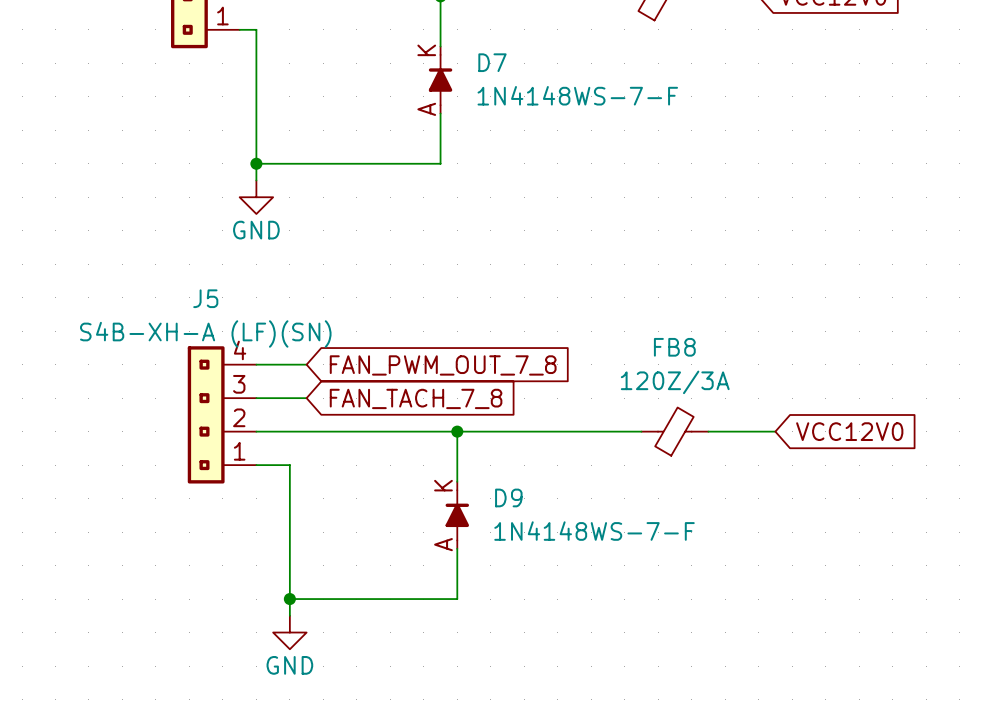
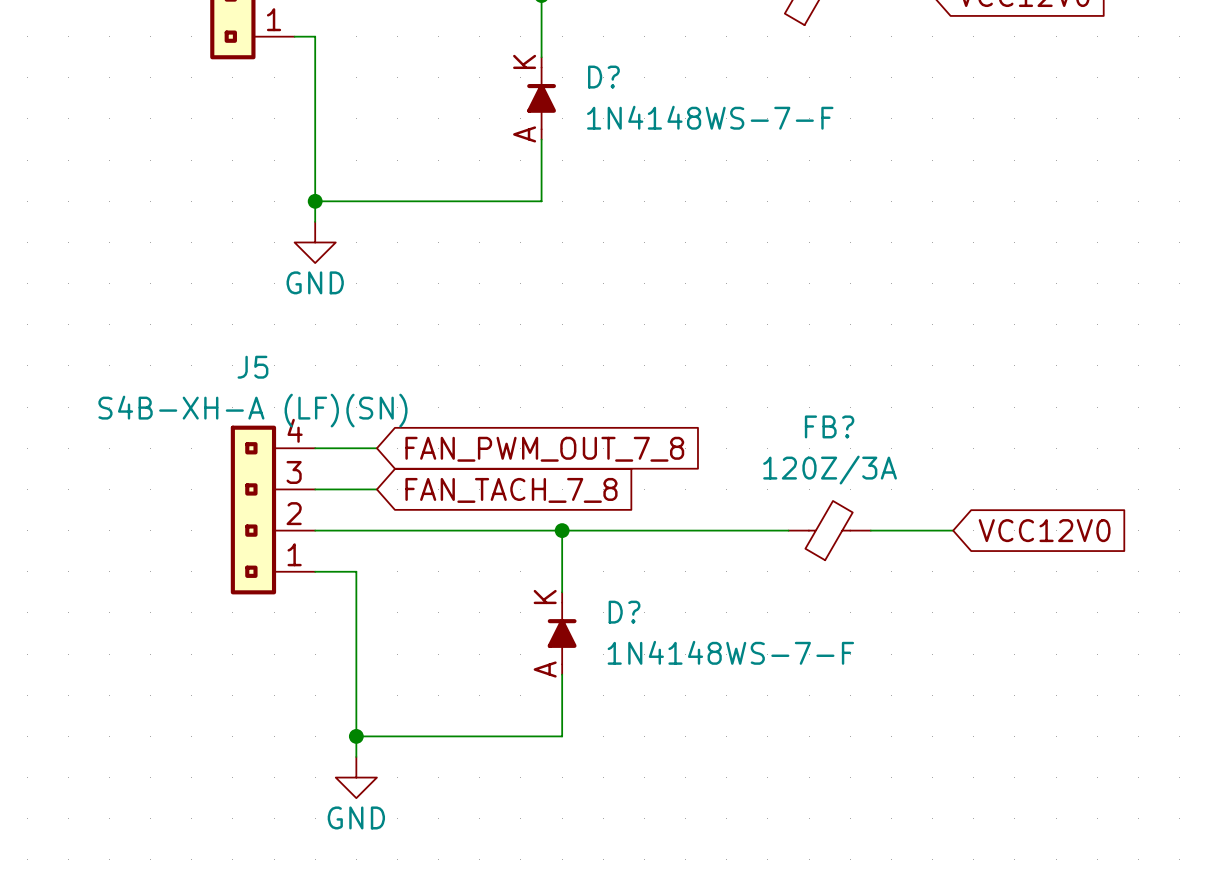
D7 name: D7 (492, 62) -> D? (603, 77)
FB8 name: FB8 (674, 347) -> FB? (829, 426)
D9 name: D9 (508, 497) -> D? (624, 612)

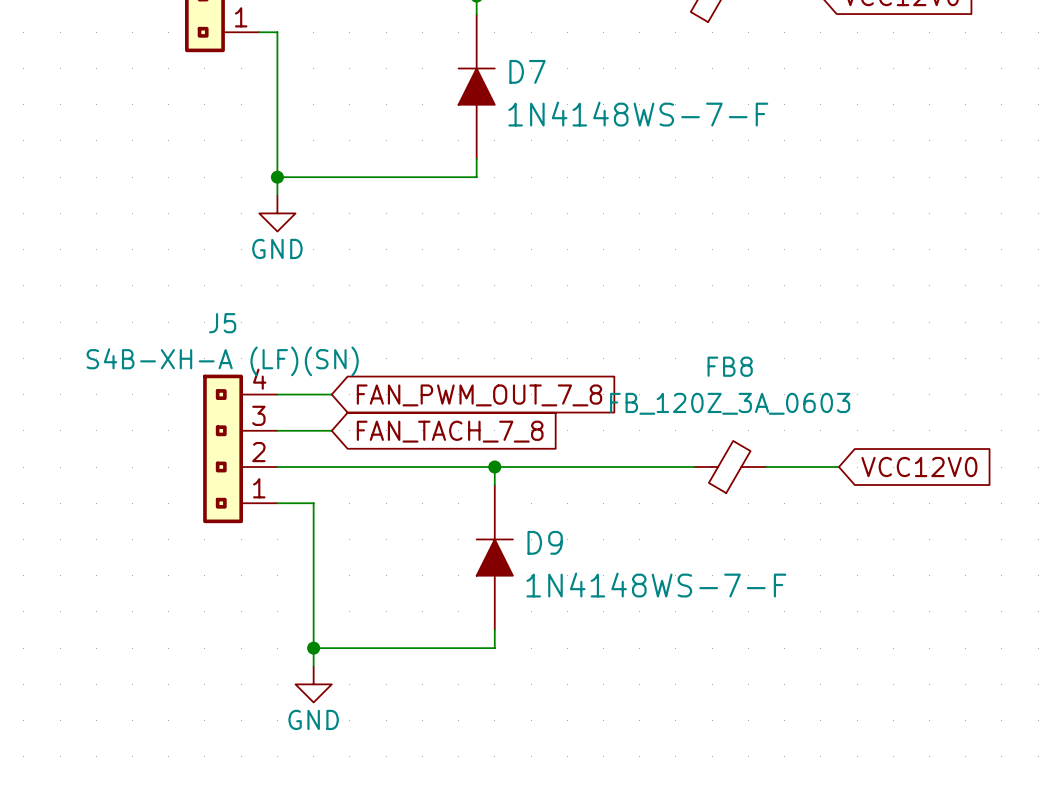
D?: (541, 98) -> none
D7: none -> 1N4148WS-7-F (476, 86)
FB? name: FB? (829, 426) -> FB8 (730, 366)
FB? value: none -> FB_120Z_3A_0603 (730, 403)
FB? text: 120Z/3A (830, 470) -> none
D?: (562, 633) -> none
D9: none -> 1N4148WS-7-F (494, 557)

